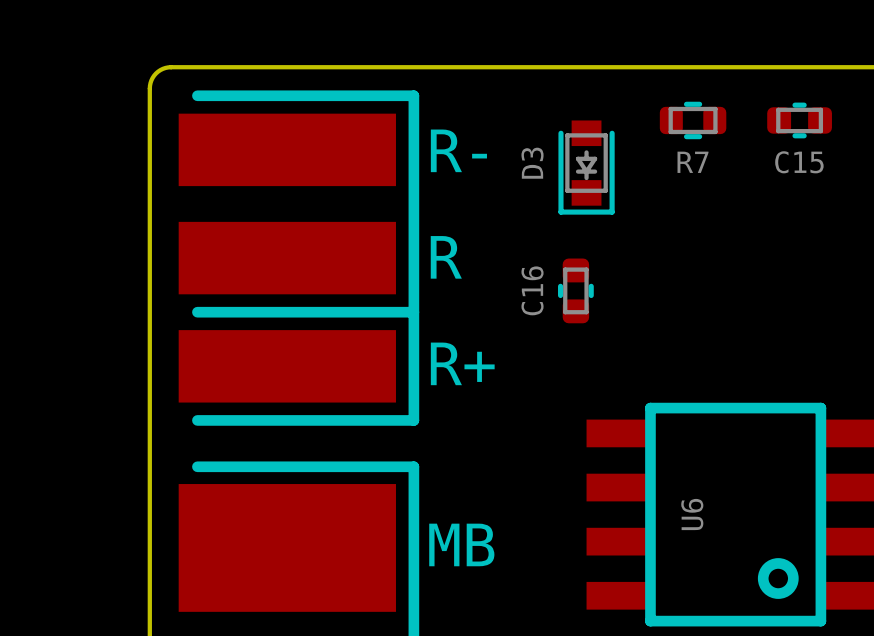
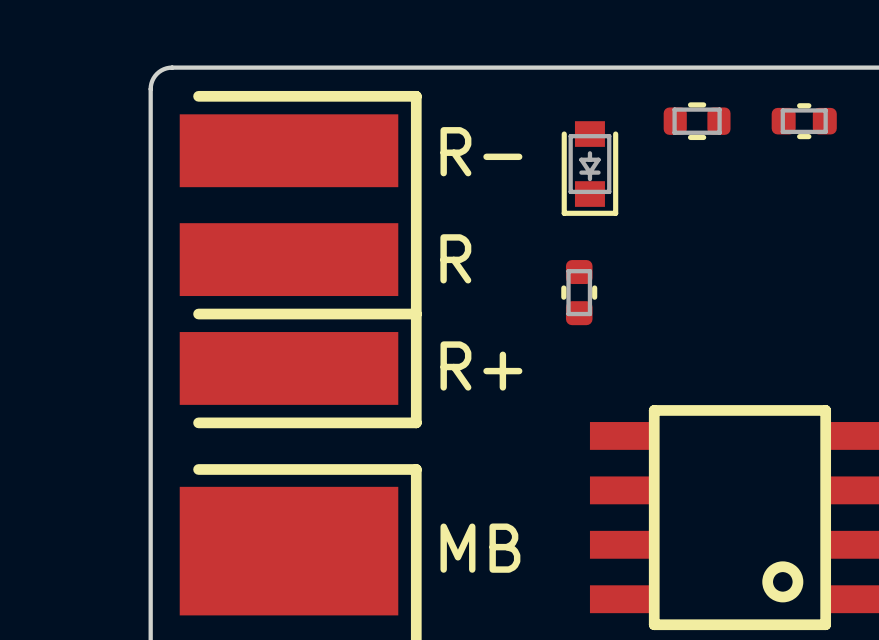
R7 name: R7 (692, 162) -> none
C15 name: C15 (799, 162) -> none
D3 name: D3 (532, 163) -> none
C16 name: C16 (532, 290) -> none
U6 name: U6 (692, 514) -> none

